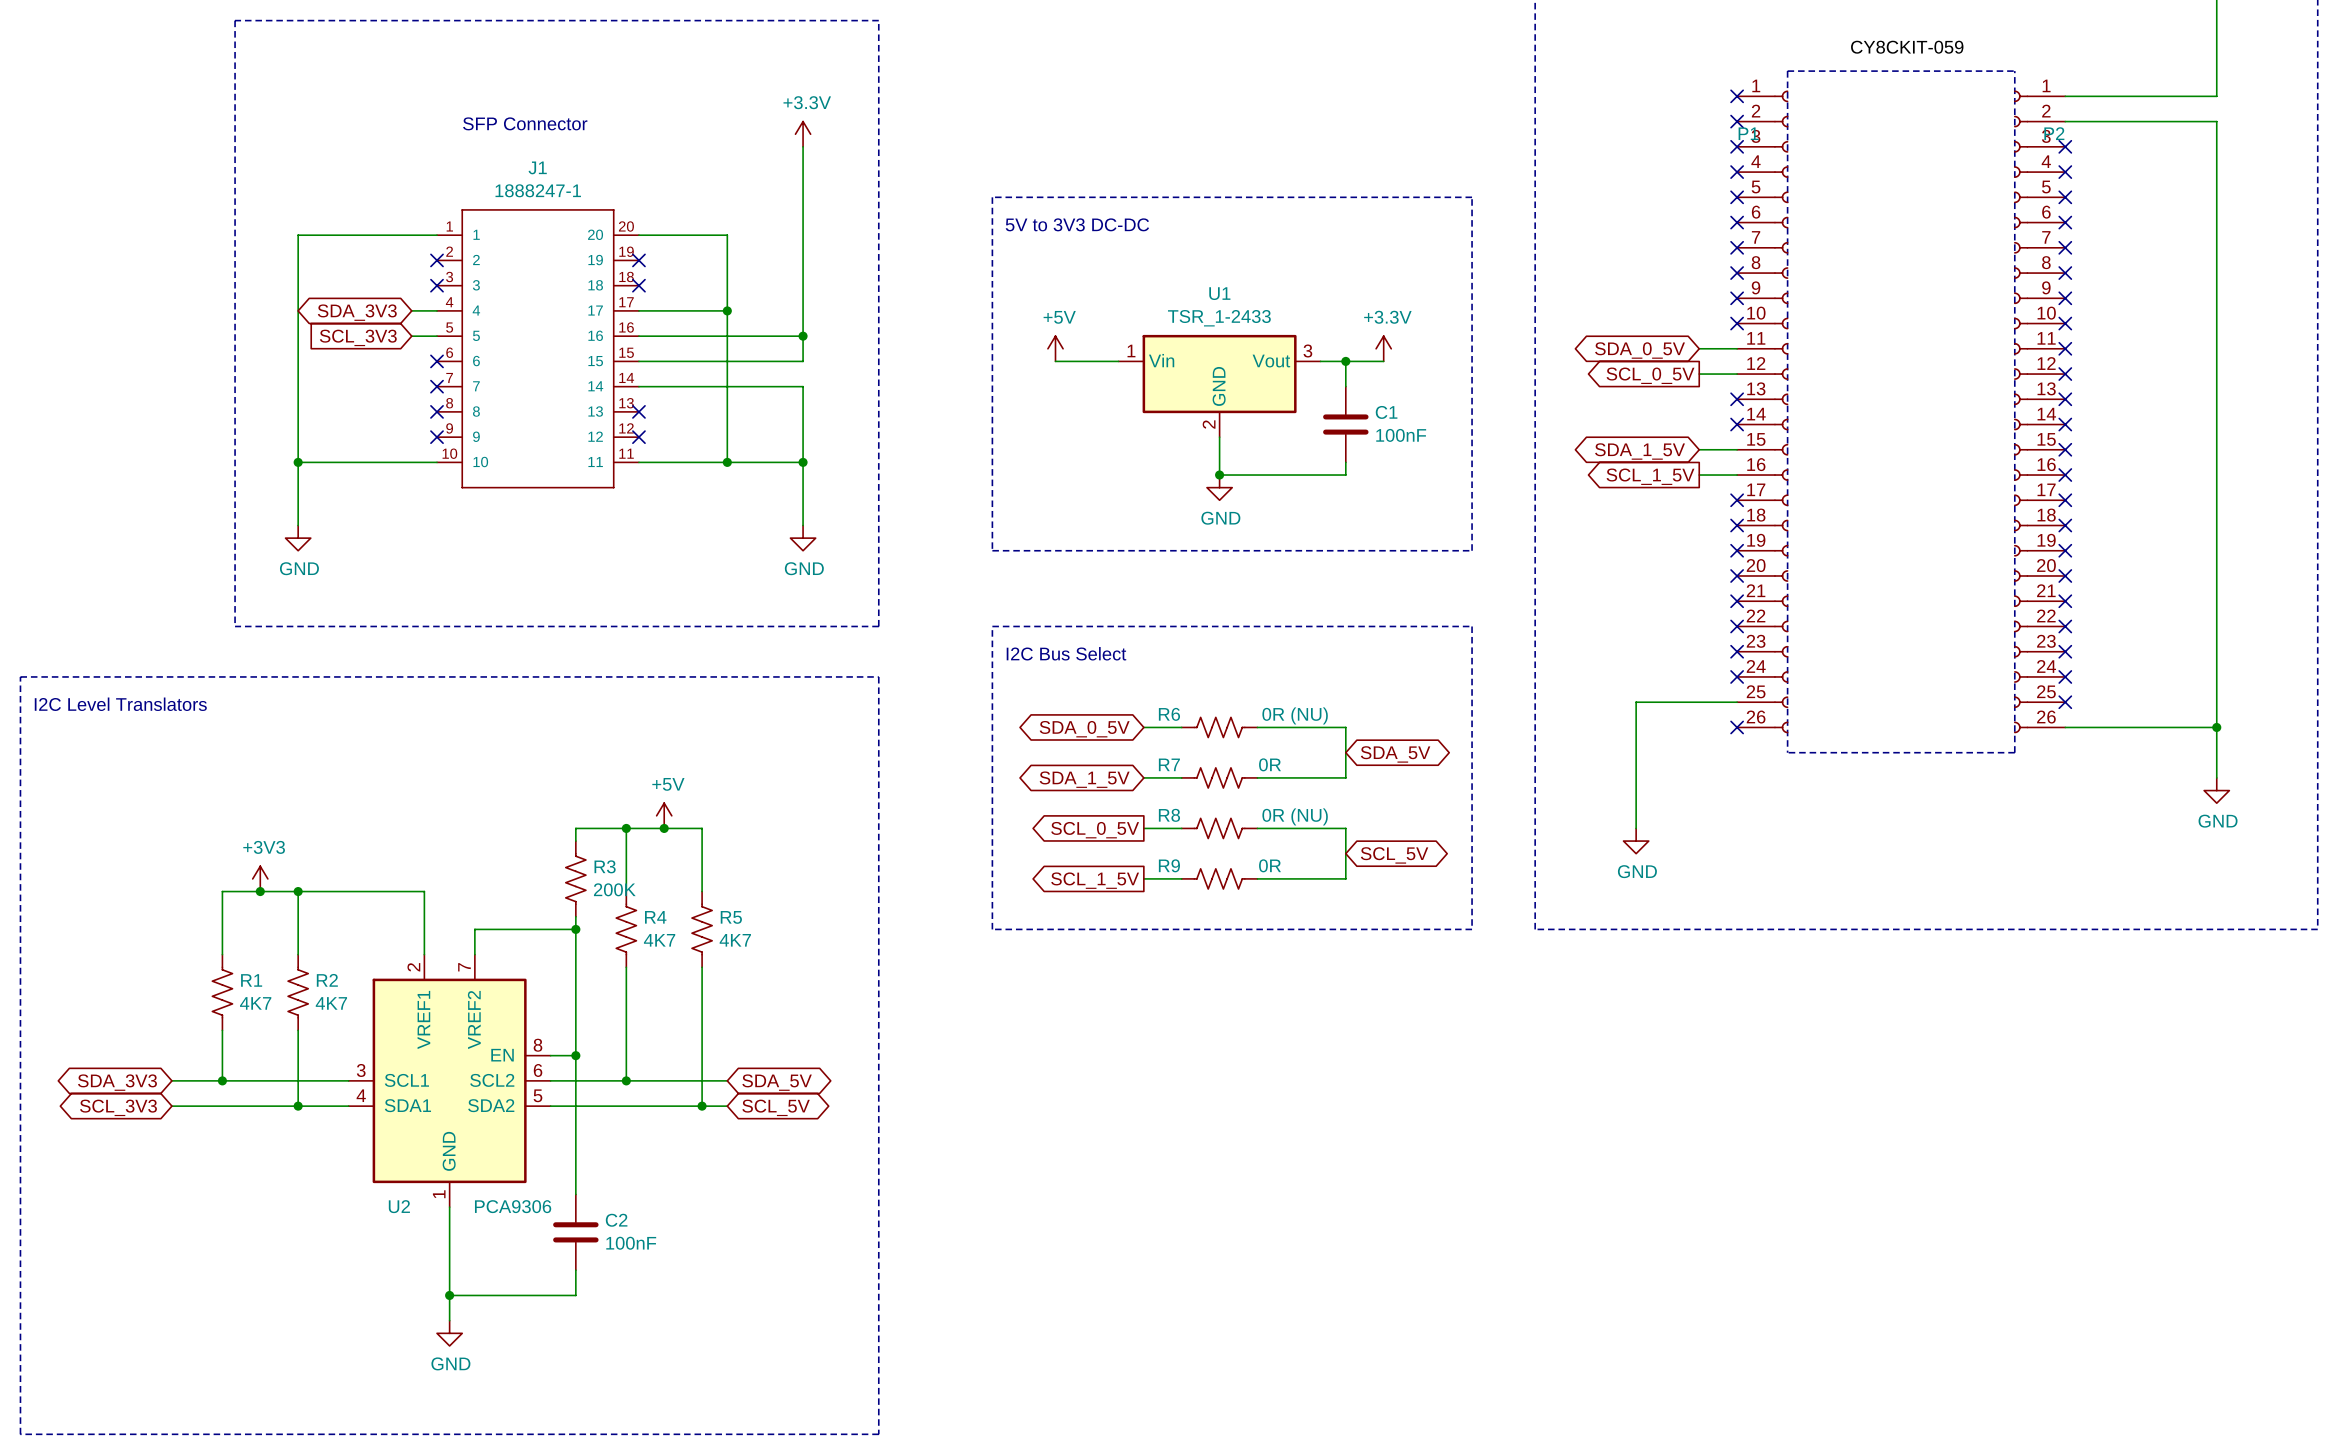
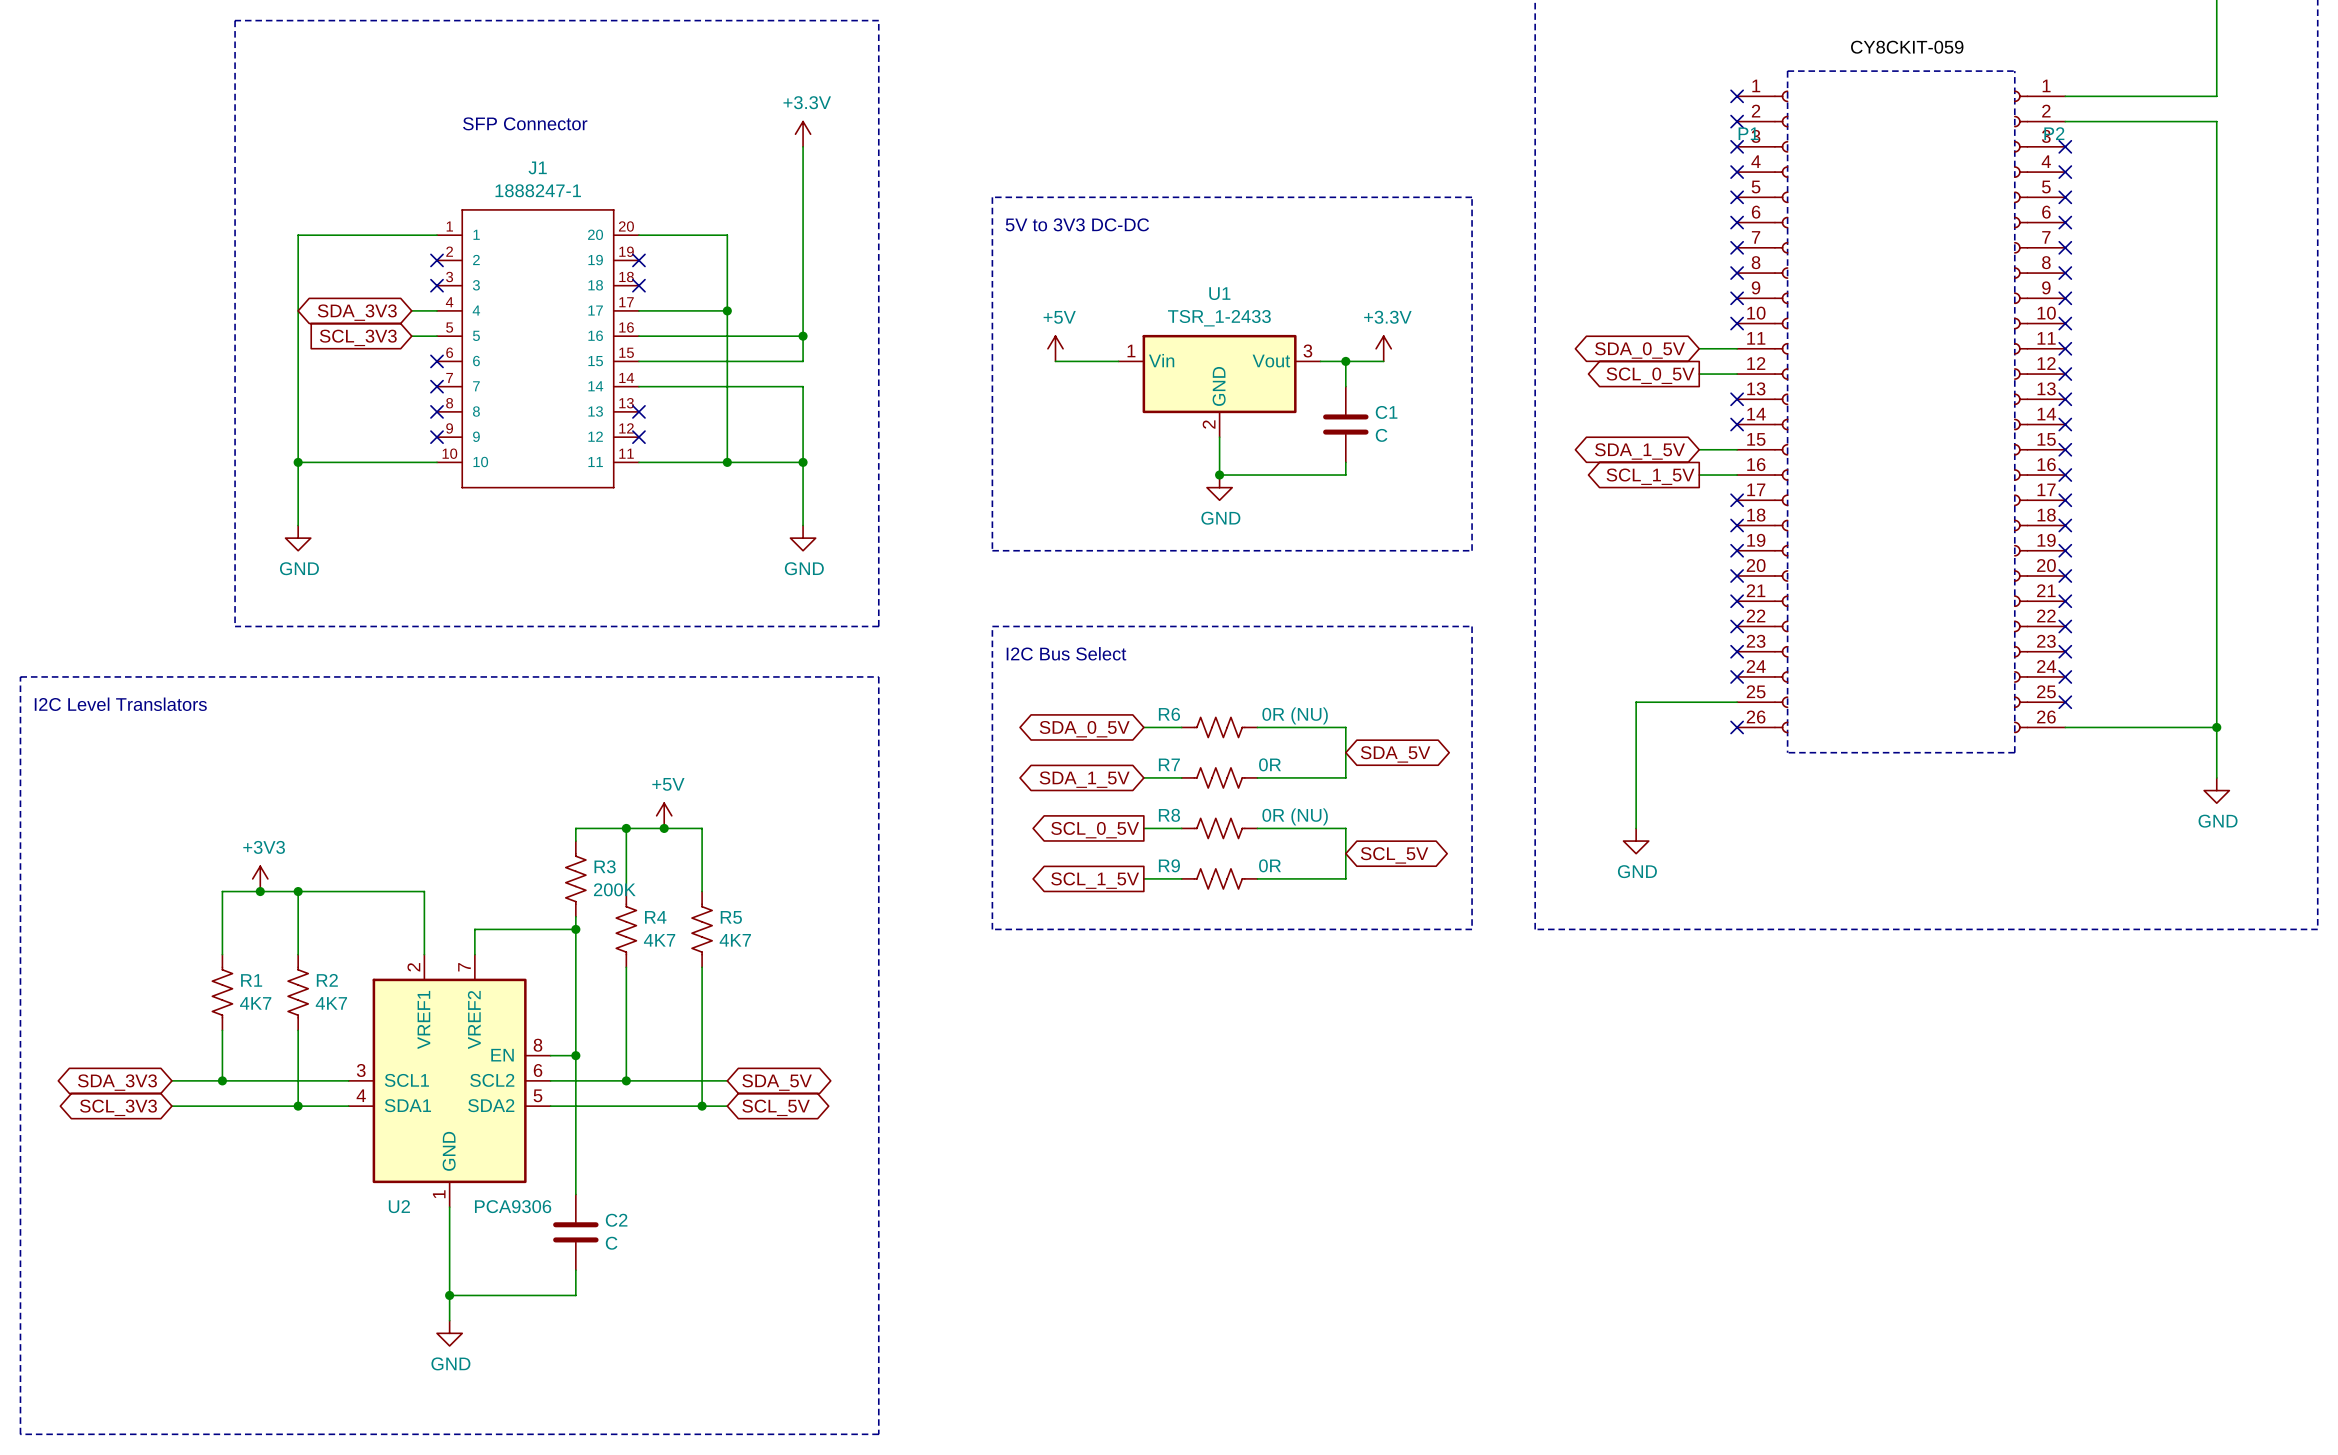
C1 value: 100nF (1401, 435) -> C (1381, 435)
C2 value: 100nF (631, 1243) -> C (611, 1243)

